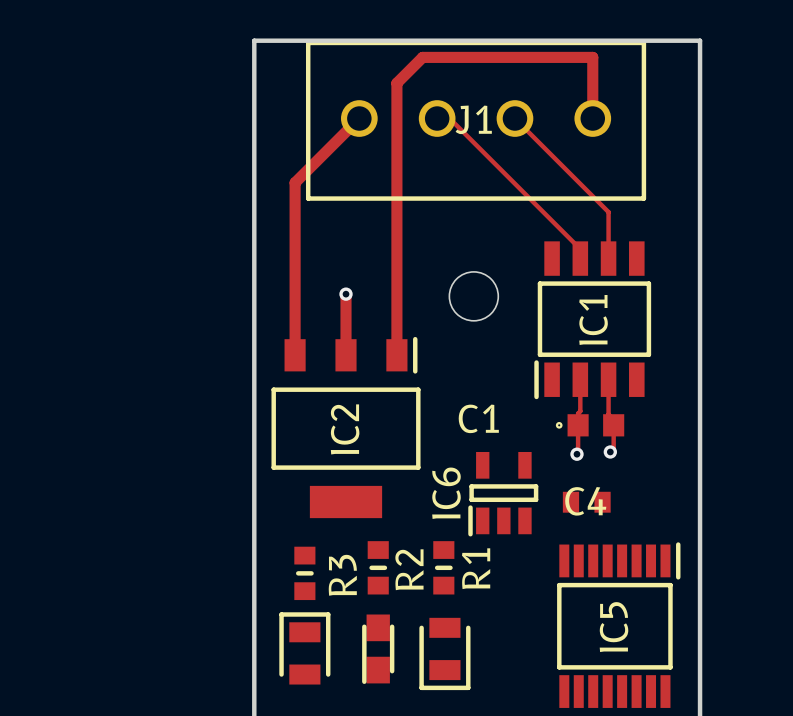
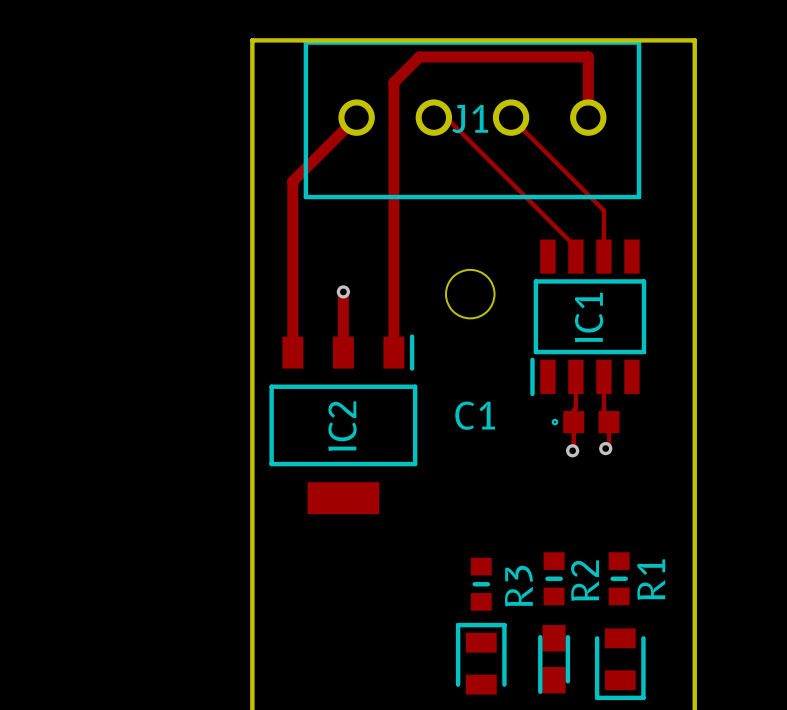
IC6: (503, 494) -> none
C4: (586, 502) -> none
R2 position: (378, 567) -> (554, 578)
R1 position: (443, 567) -> (619, 578)
R3 position: (304, 573) -> (481, 584)
IC5: (618, 625) -> none
part: (304, 648) -> none
part position: (378, 649) -> (554, 659)
part rotation: 0° (444, 653) -> 180° (481, 658)
part: none -> (620, 664)

